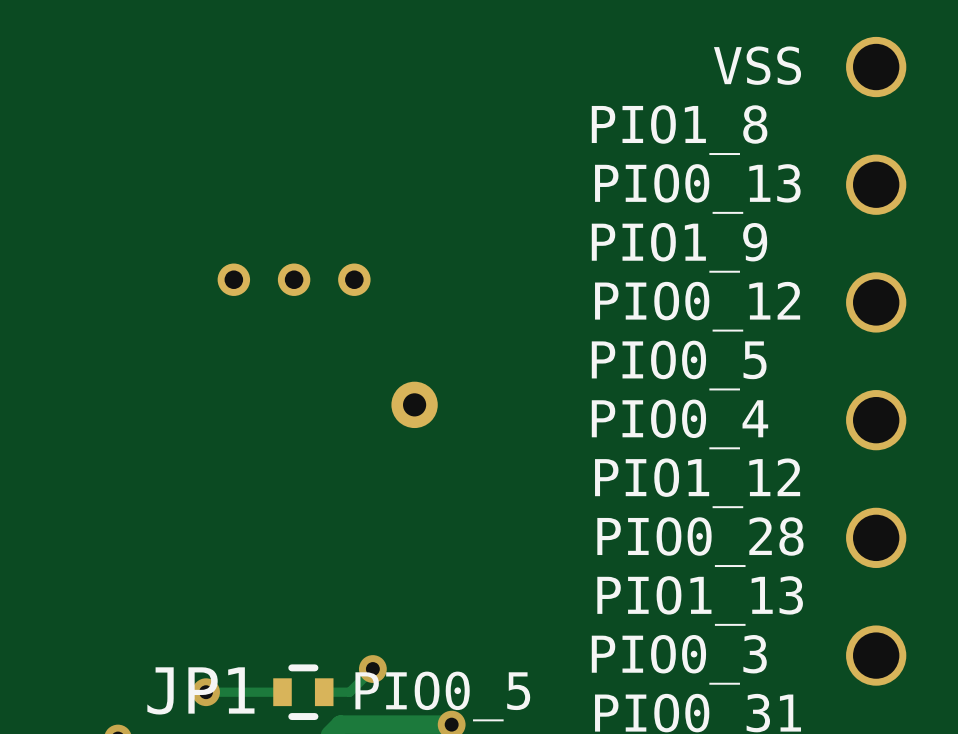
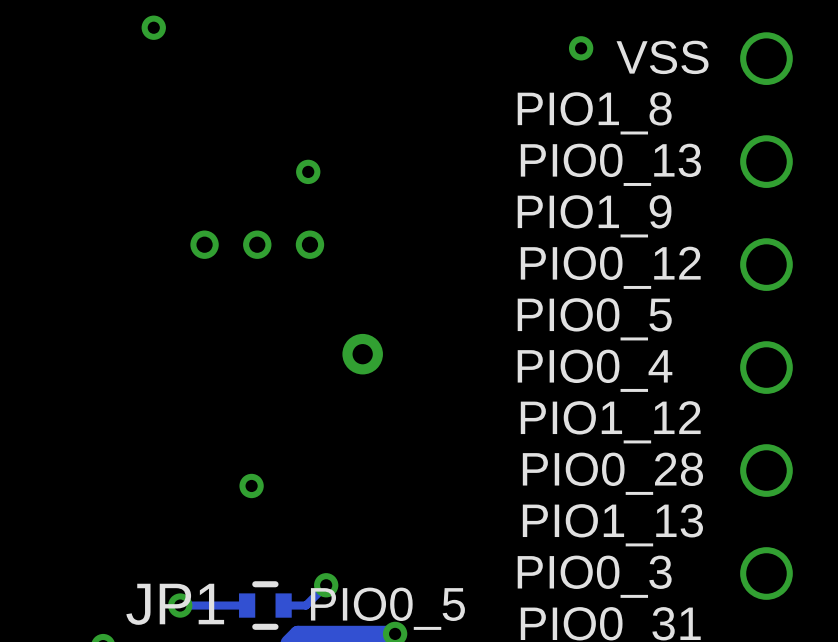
via: none -> (153, 27)
via: none -> (581, 48)
via: none -> (308, 171)
via: none -> (251, 485)

